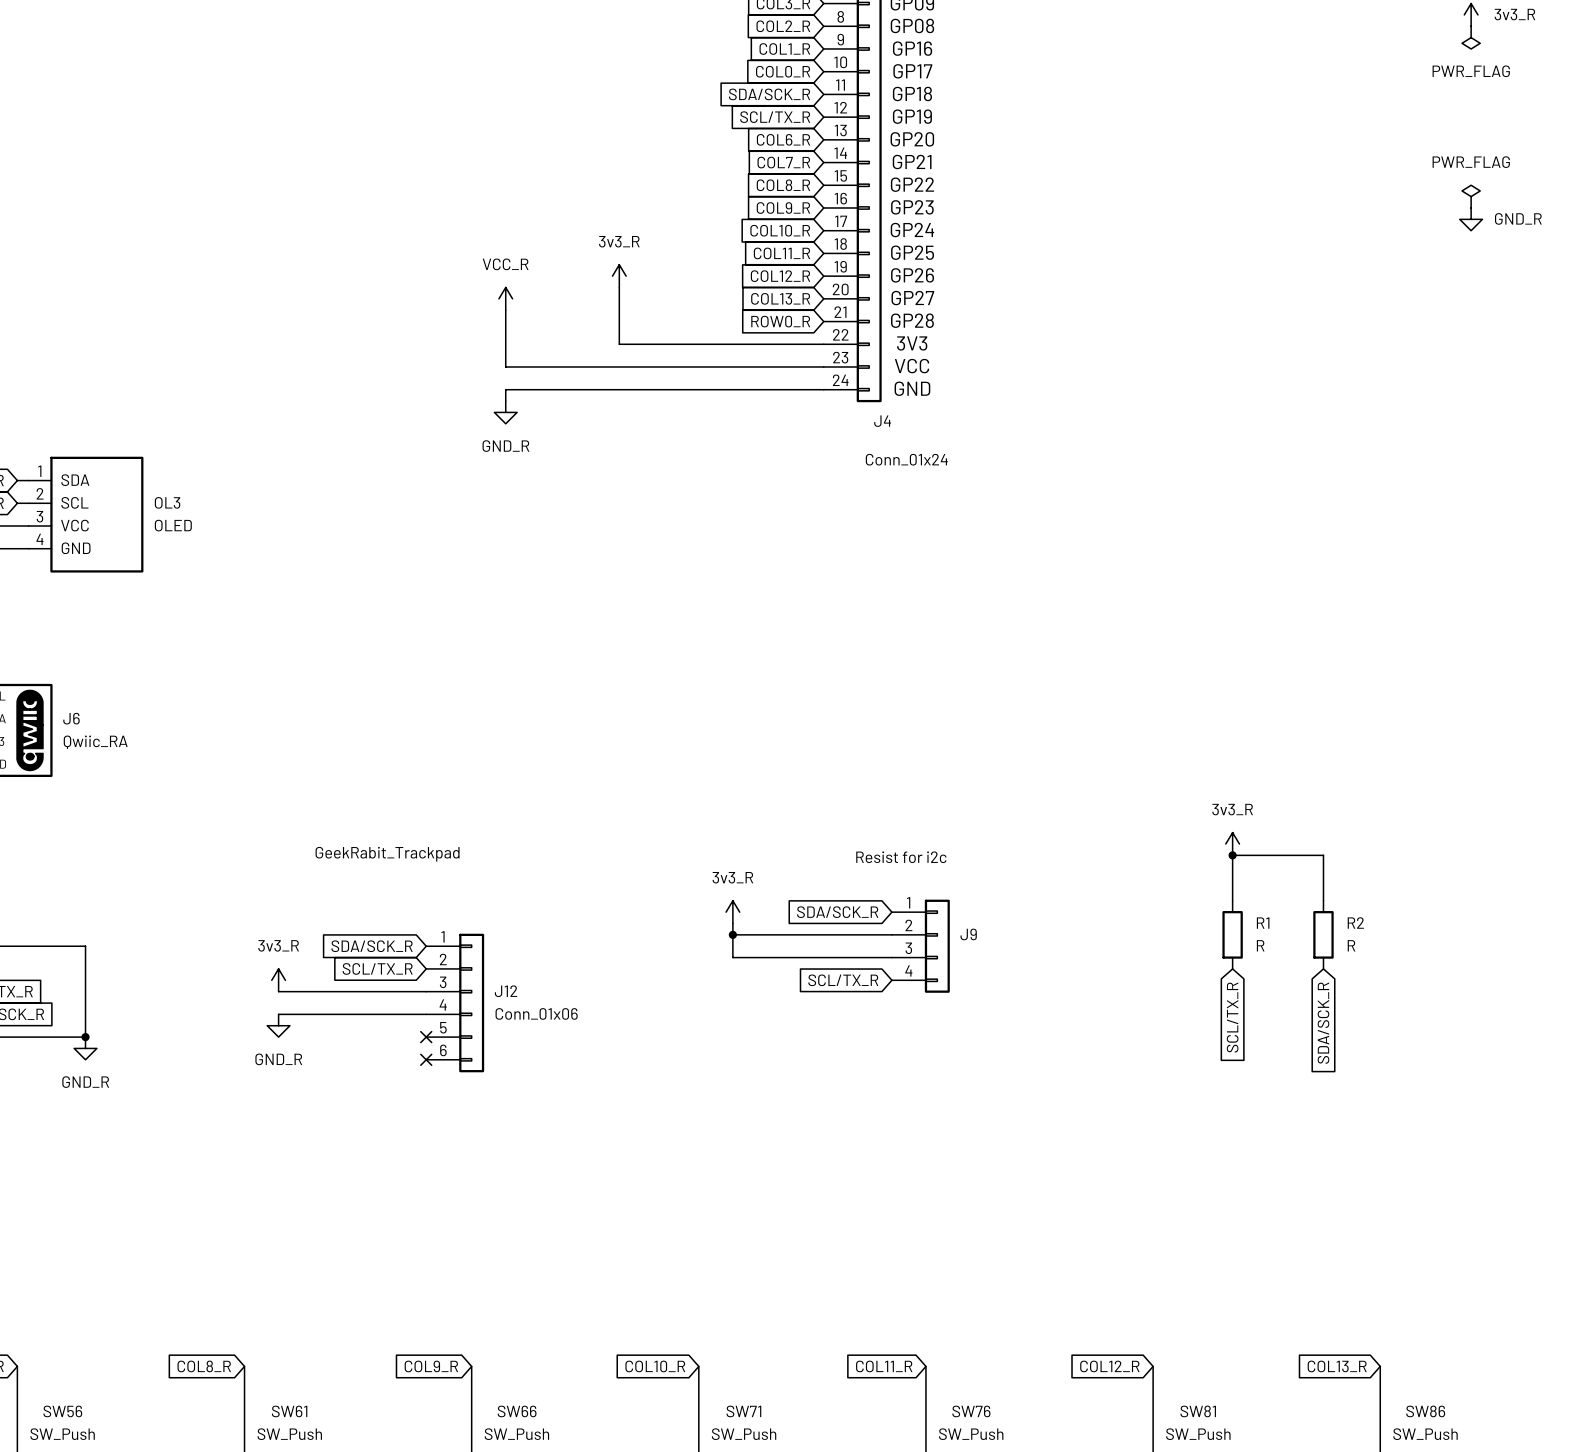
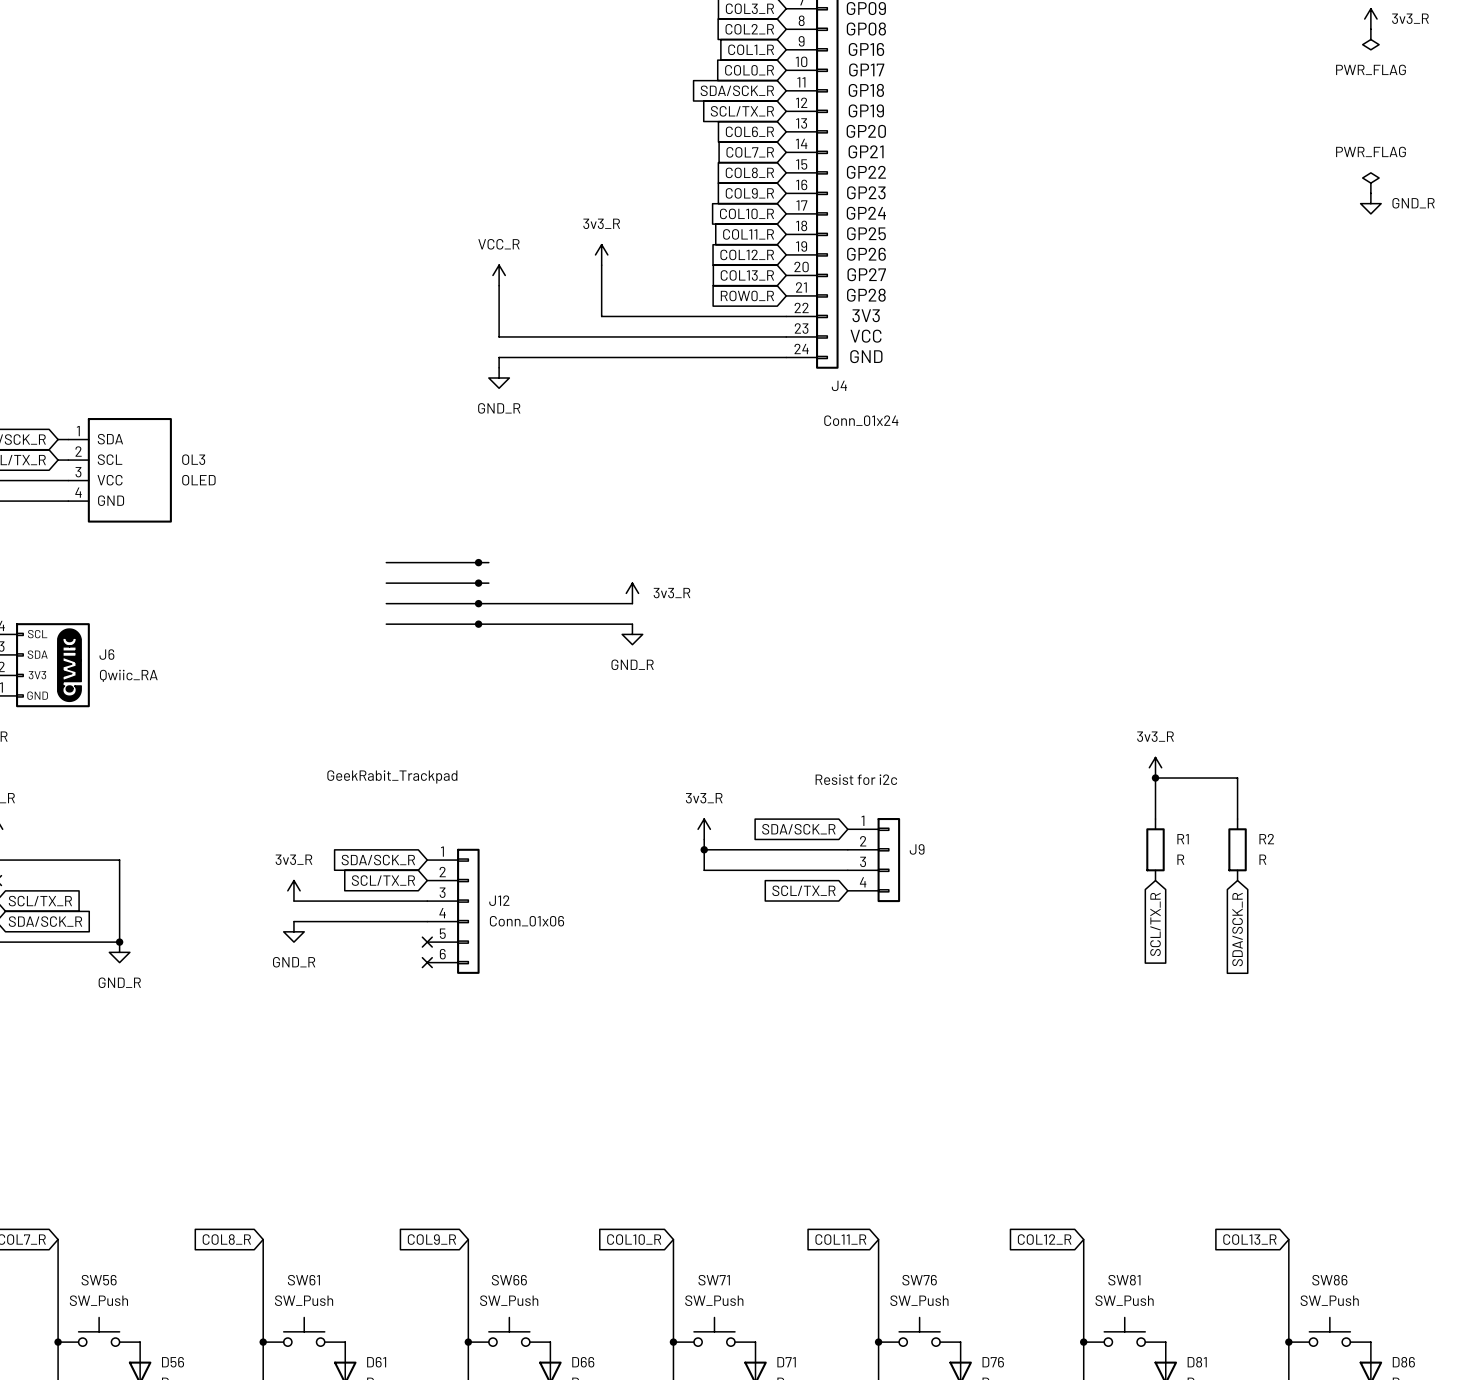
wire: none -> (386, 562) (488, 562)
junction: none -> (478, 562)
wire: none -> (386, 583) (488, 583)
junction: none -> (478, 583)
power symbol: none -> 3v3_R (632, 593)
wire: none -> (386, 603) (632, 603)
junction: none -> (478, 603)
wire: none -> (386, 624) (632, 624)
junction: none -> (478, 624)
power symbol: none -> GND_R (632, 634)

